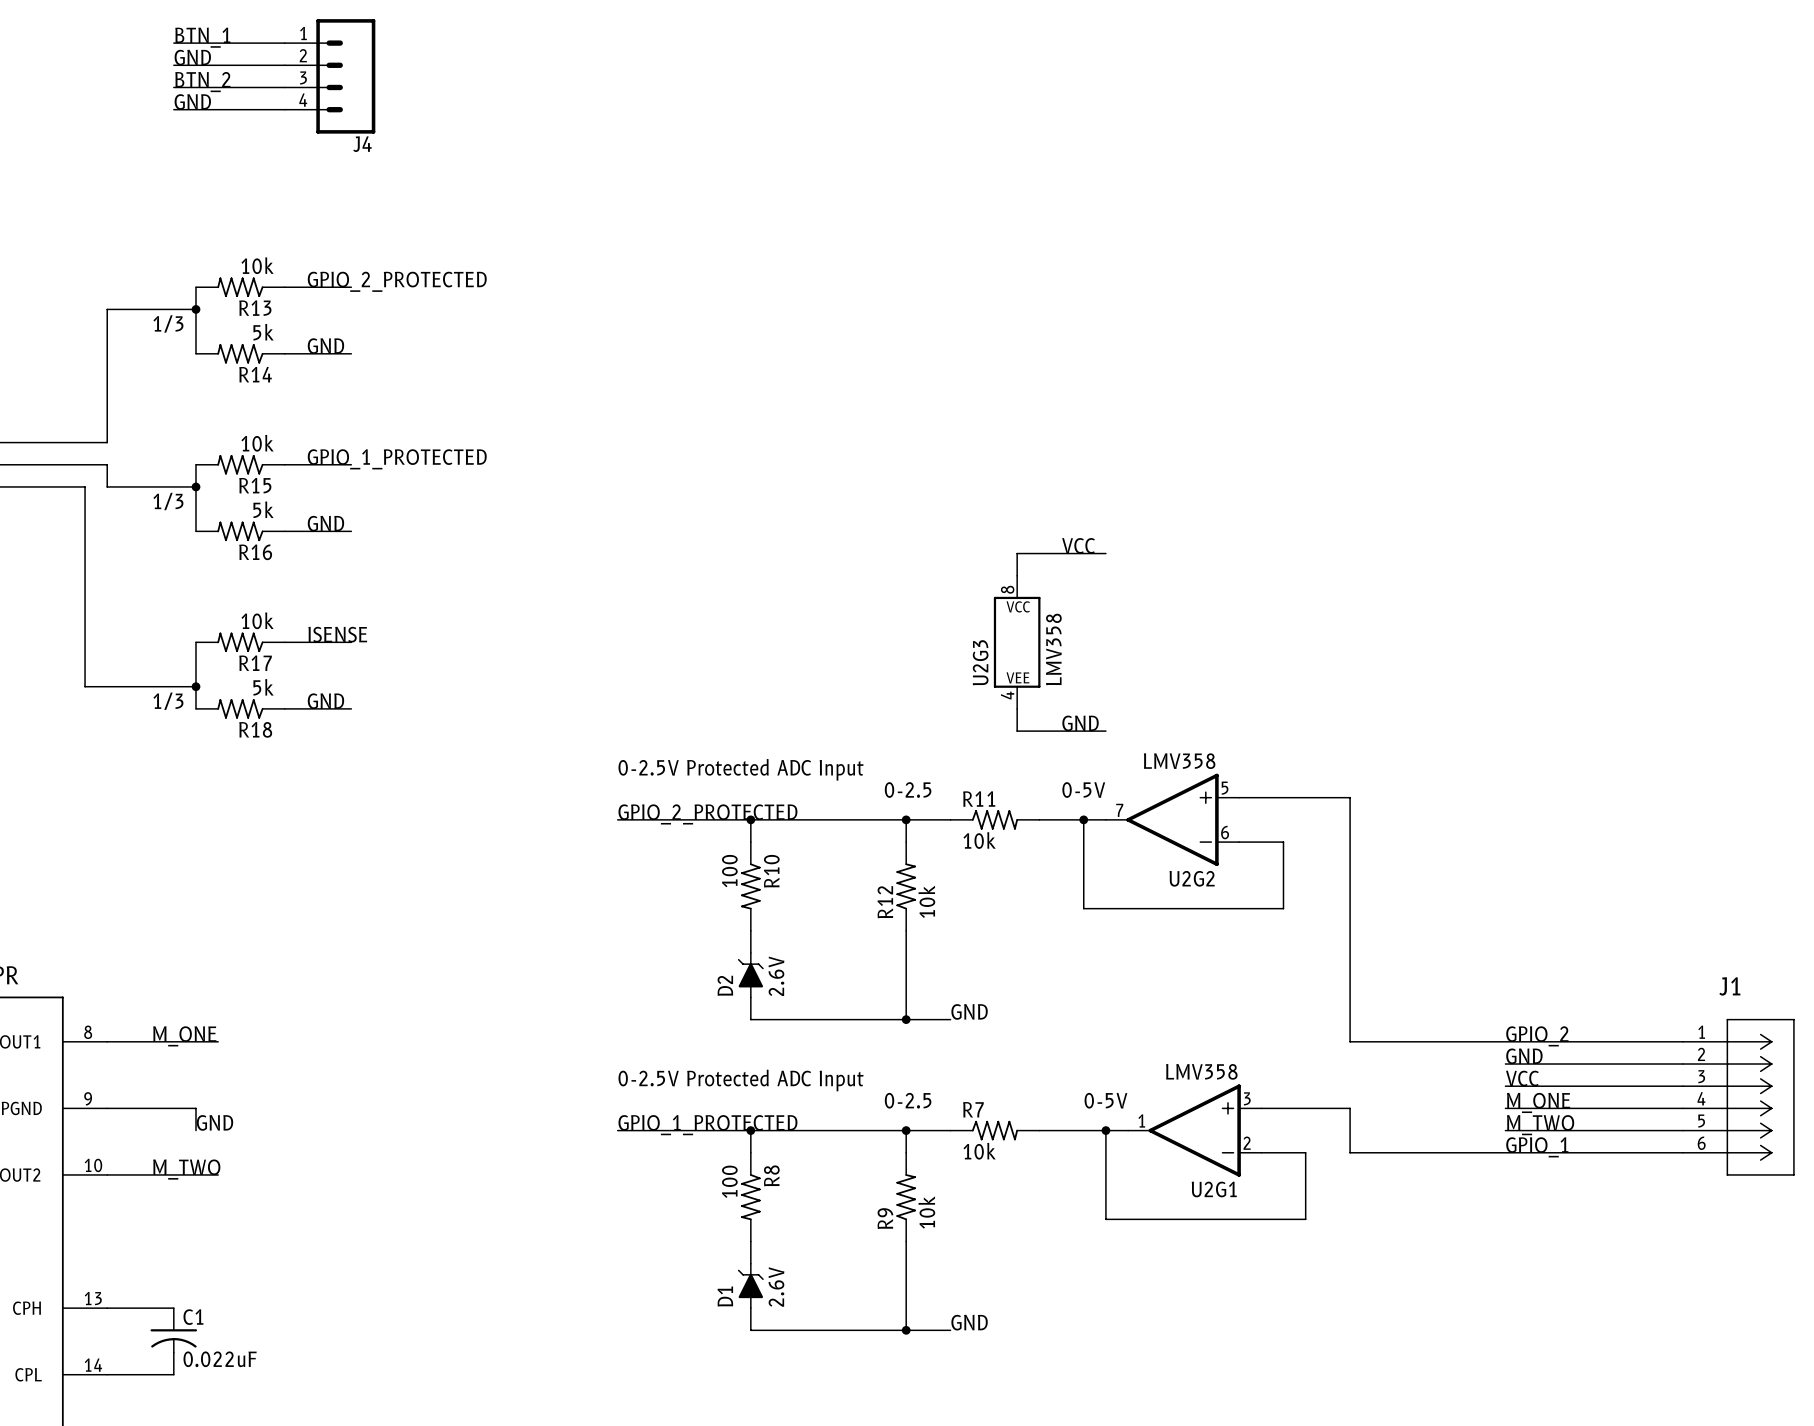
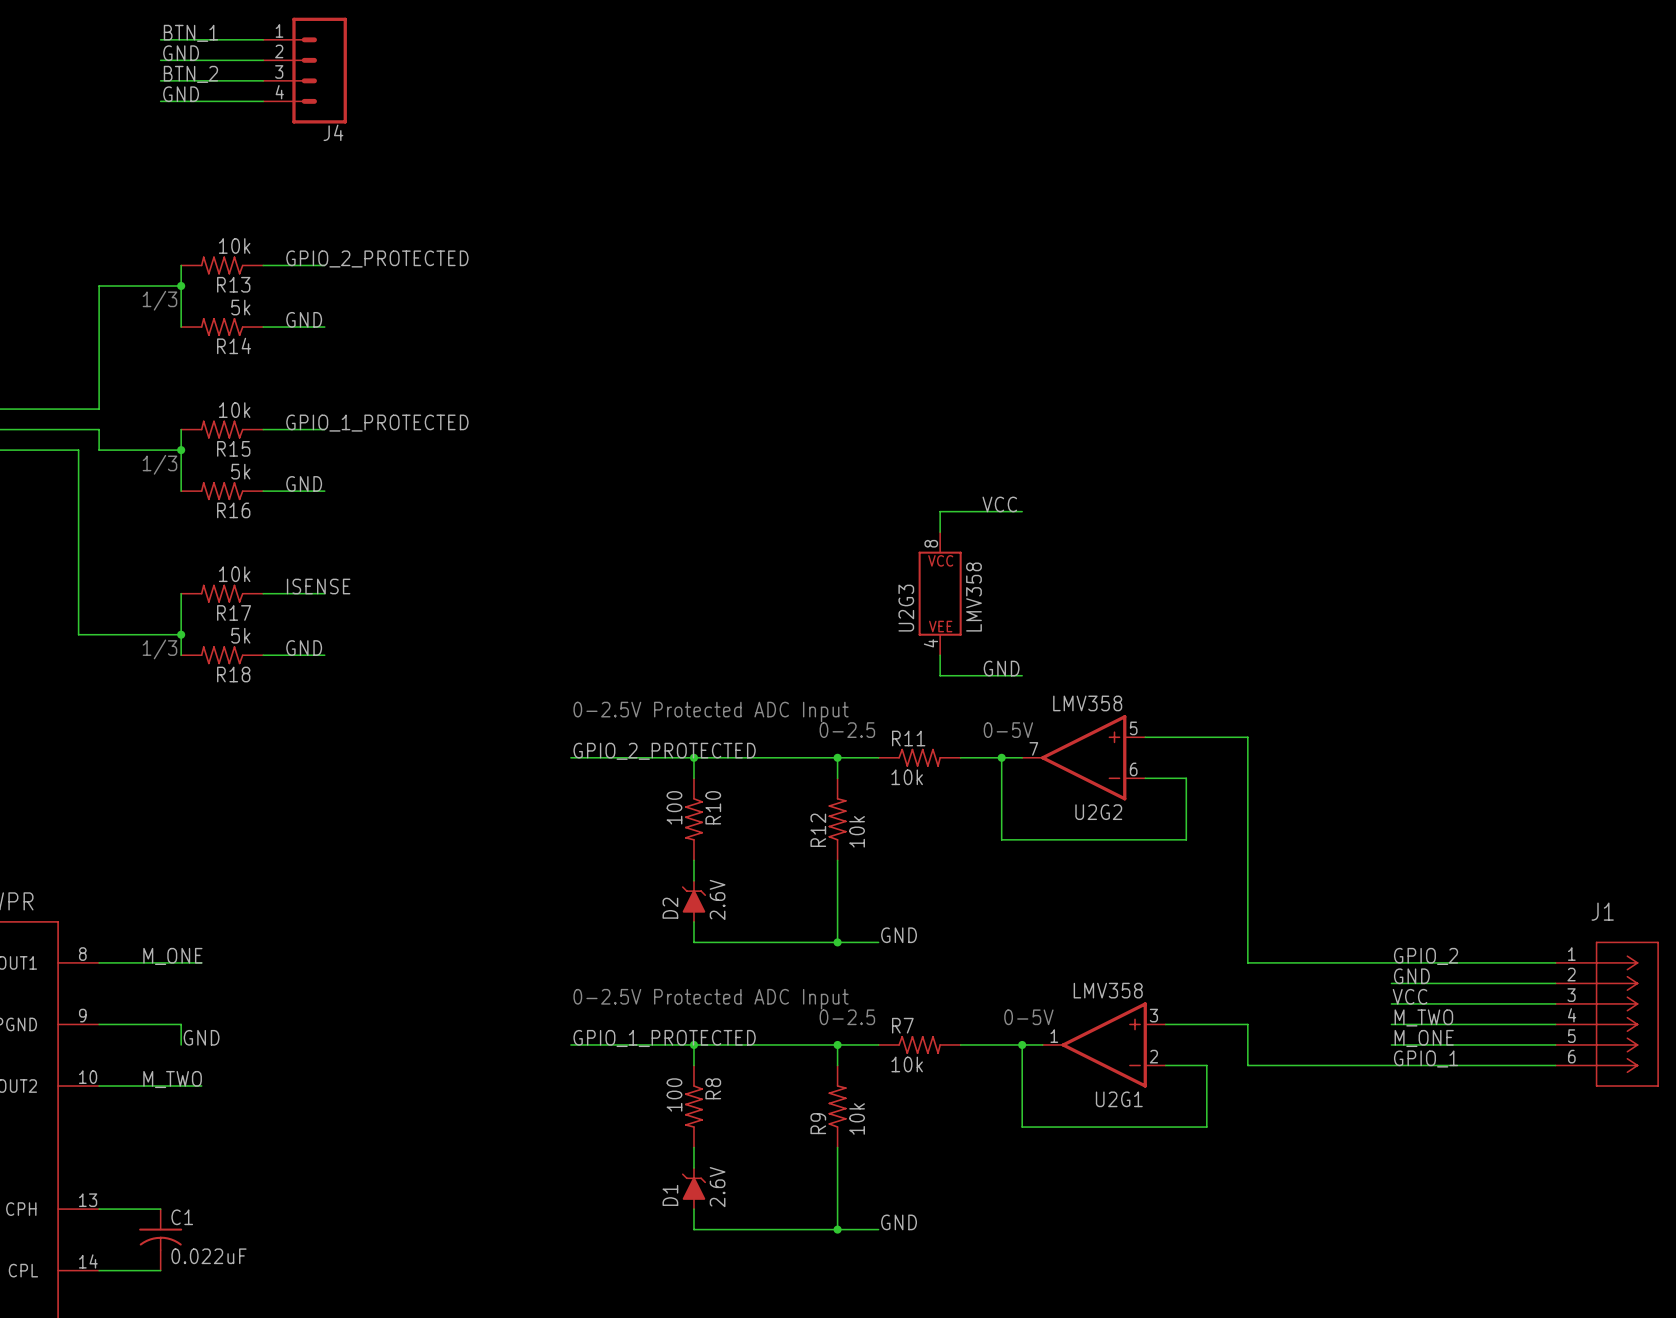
label: M_ONE (1538, 1102) -> M_TWO (1423, 1017)
label: M_TWO (1540, 1125) -> M_ONE (1424, 1038)

